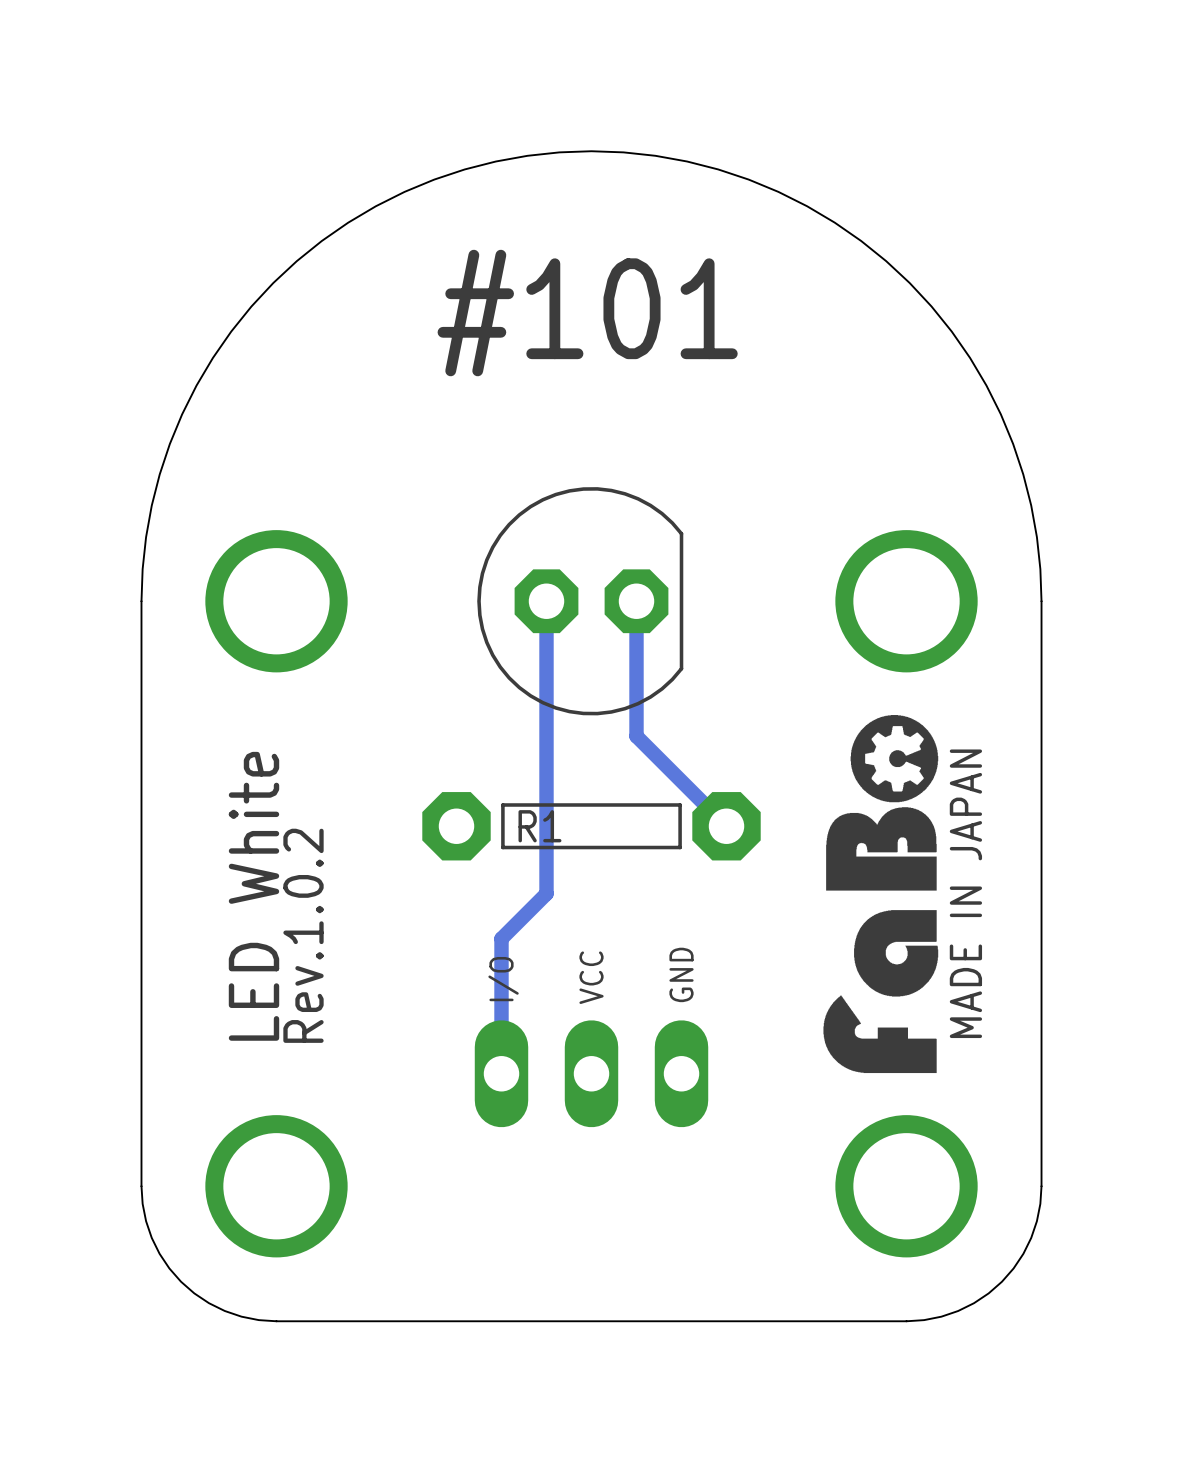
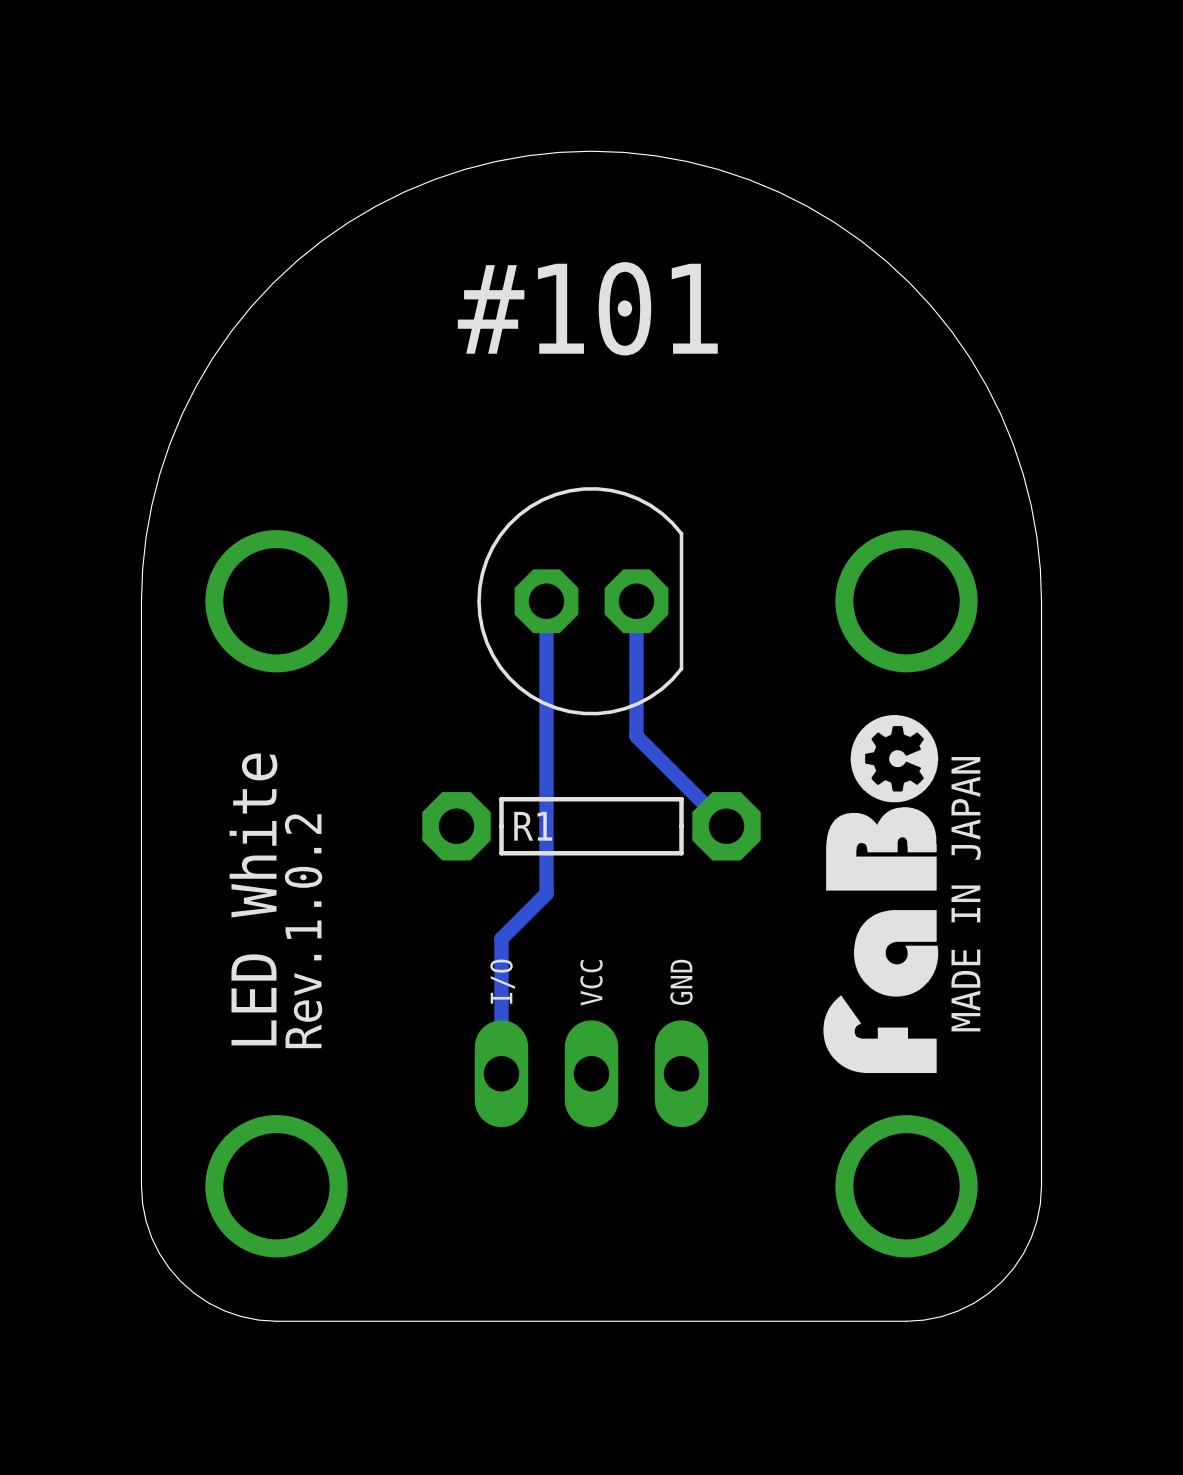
R1 footprint: [422, 792, 761, 861] -> [422, 792, 761, 861]

